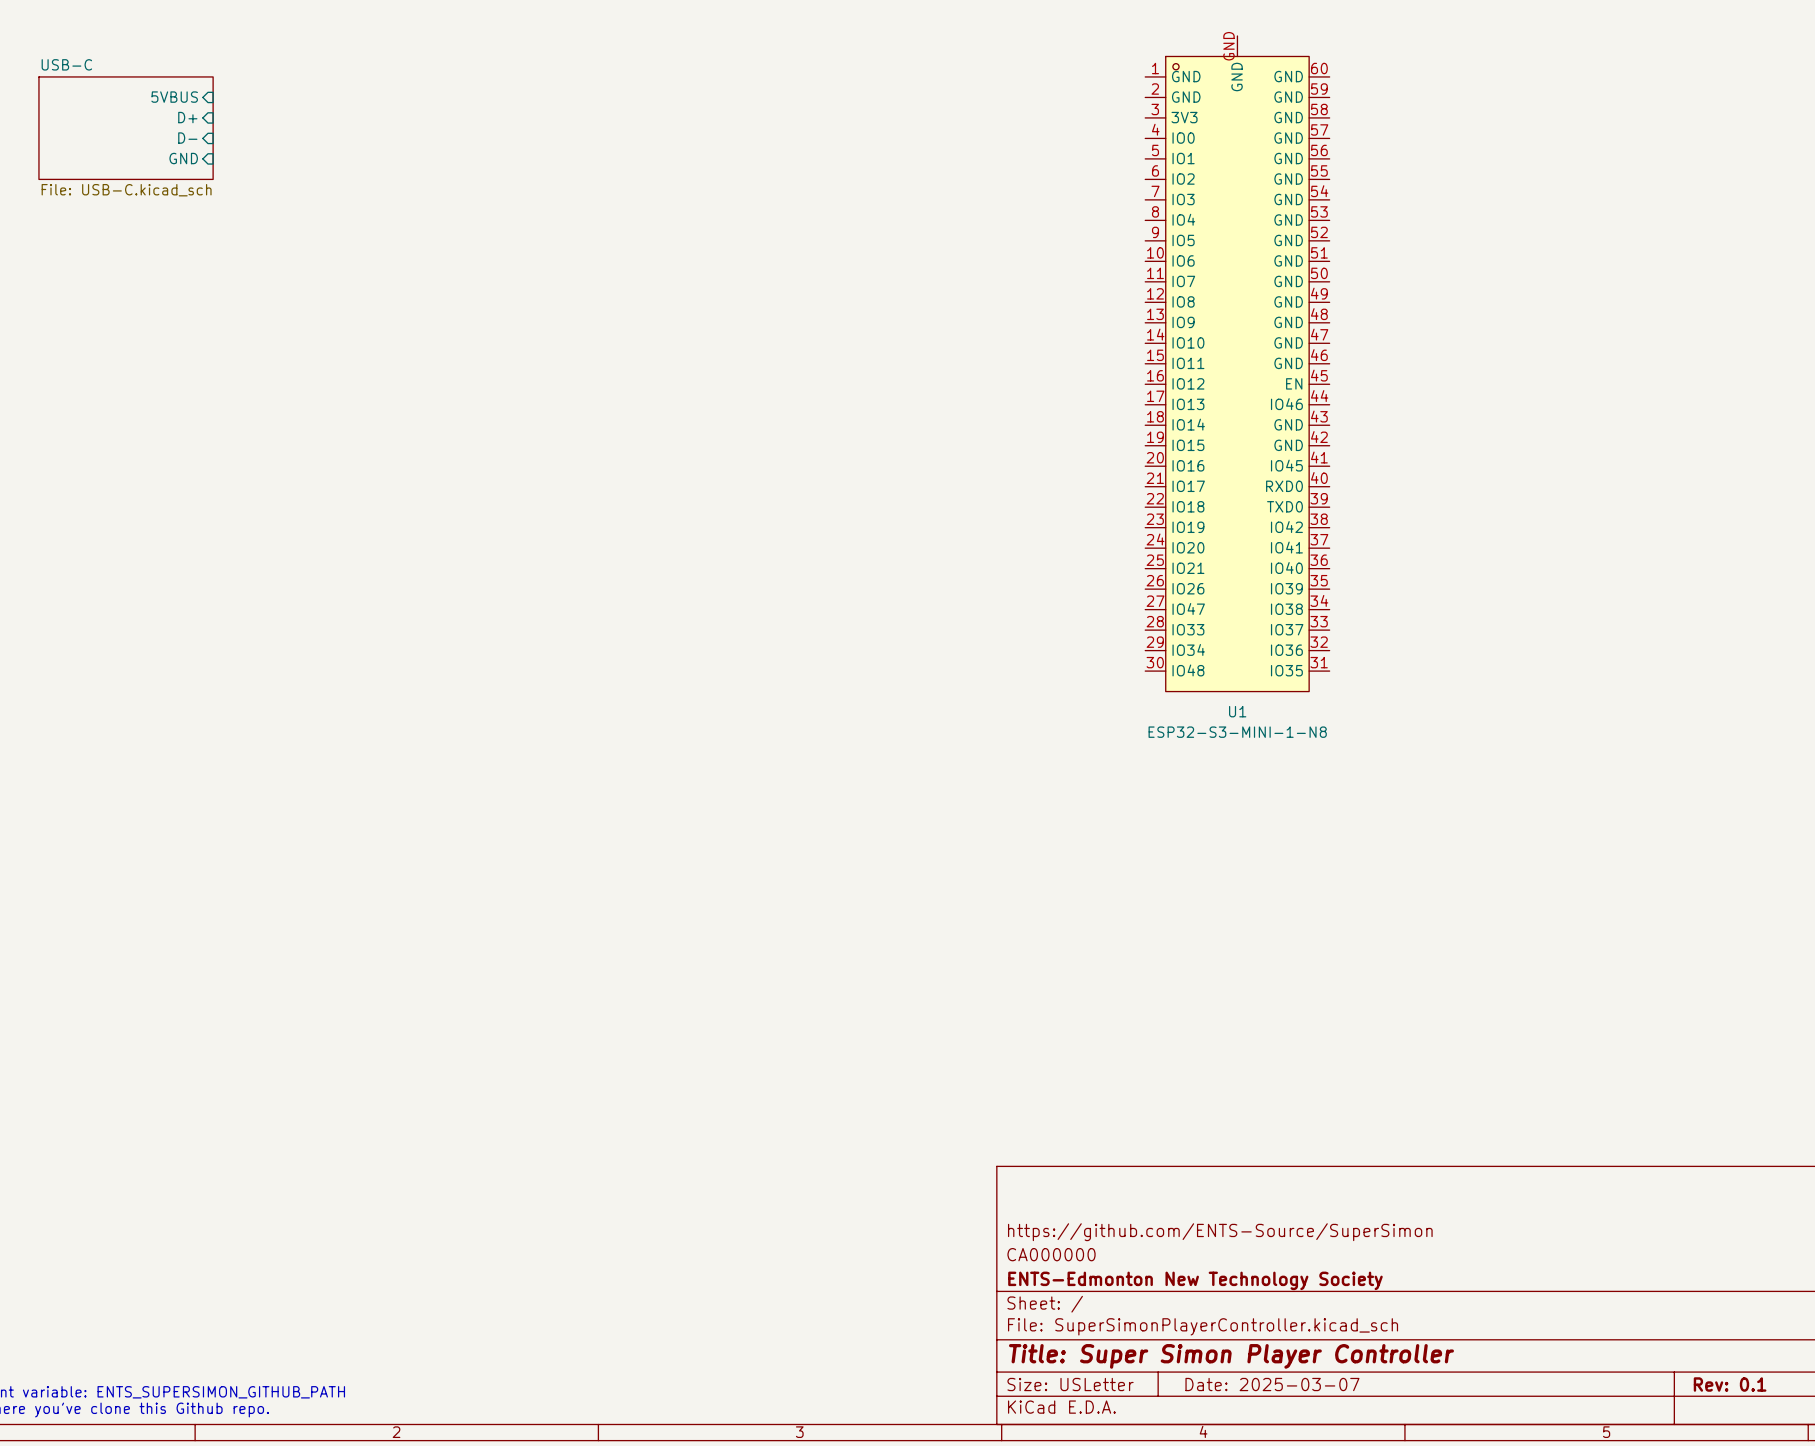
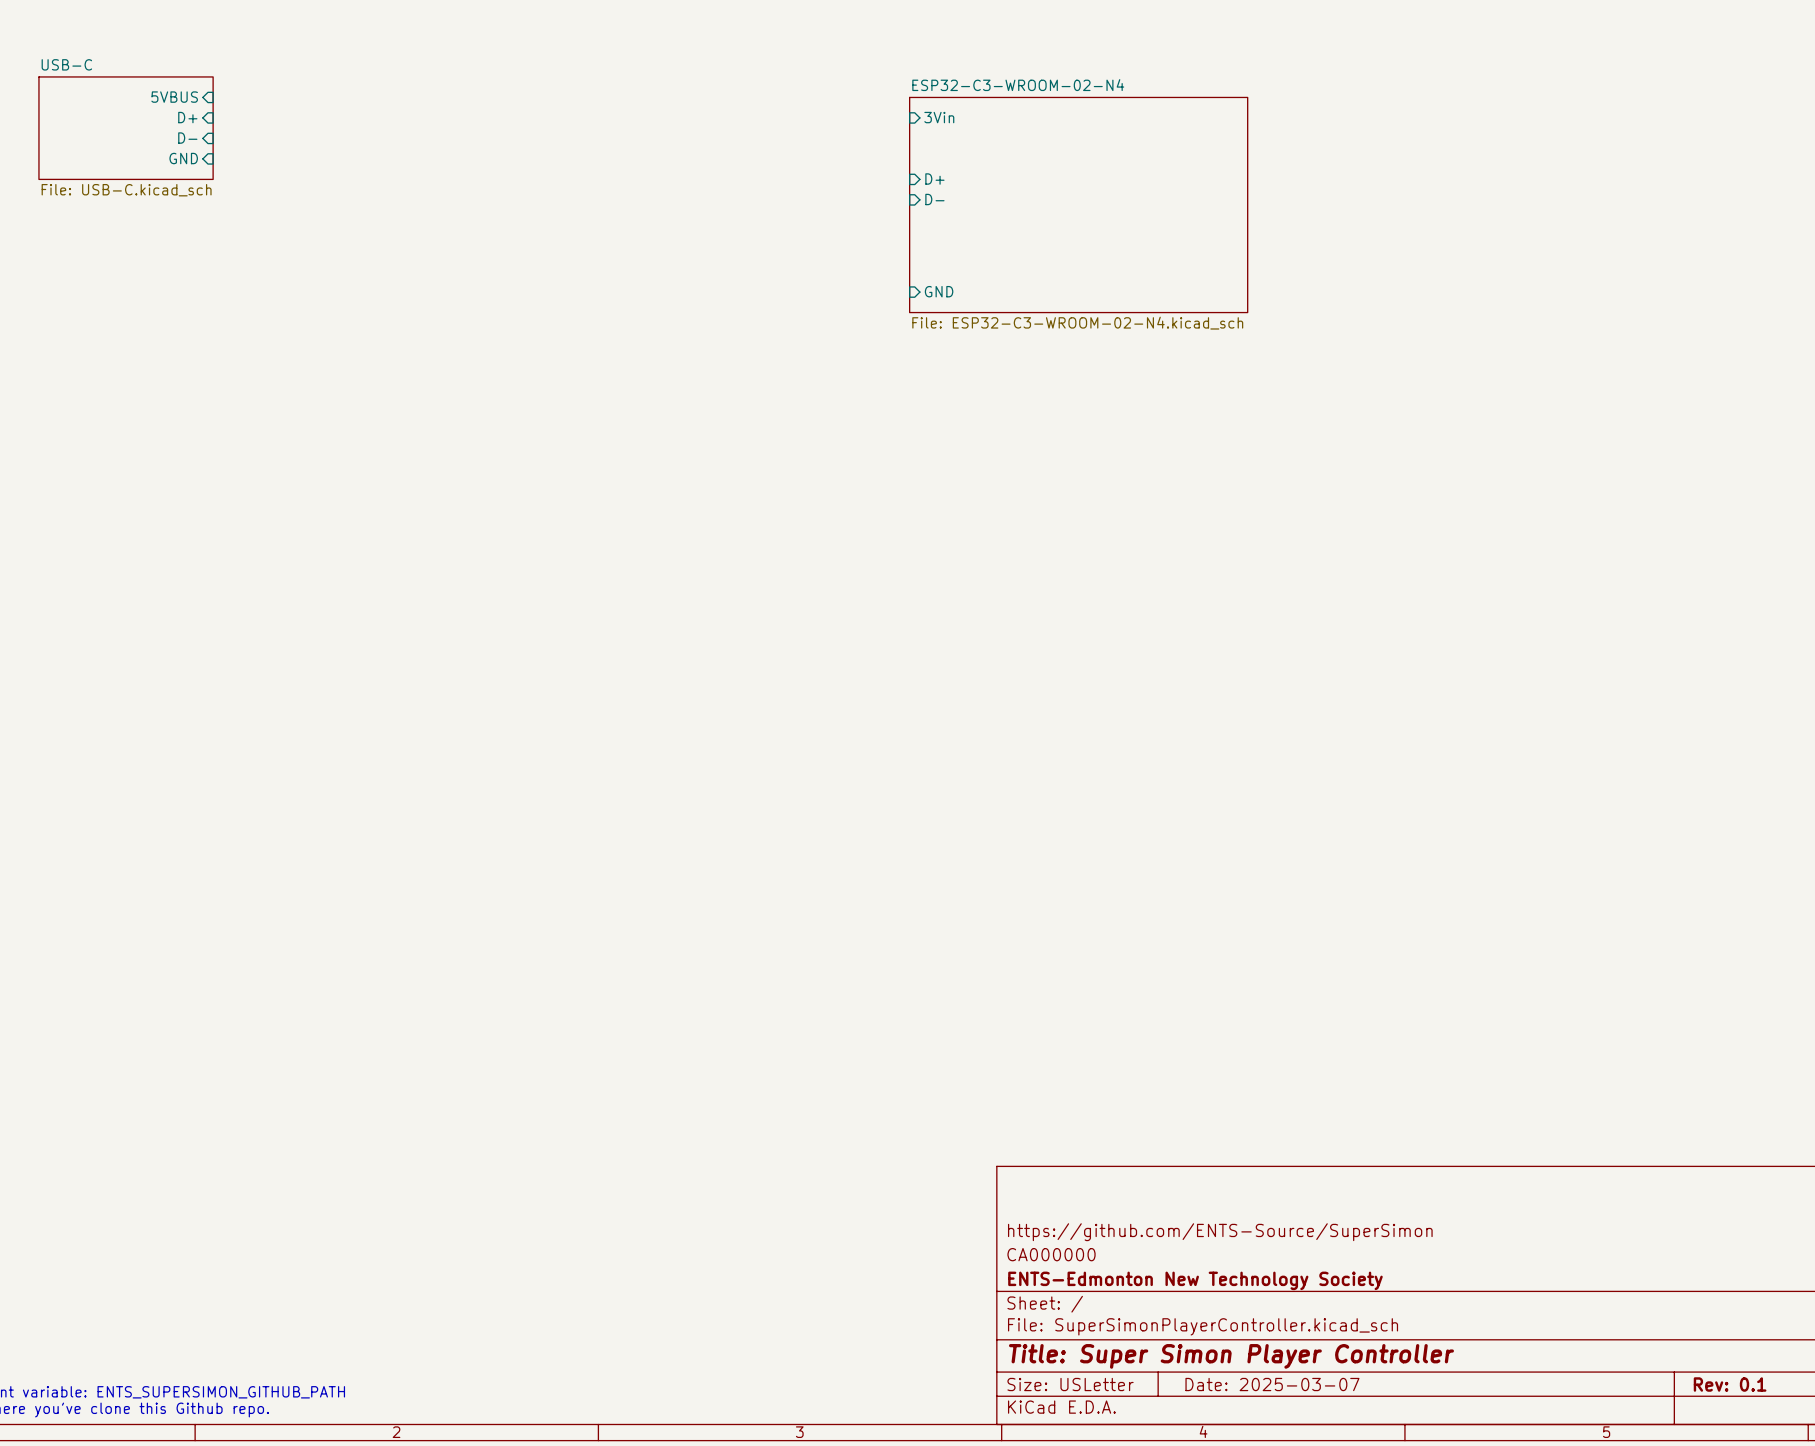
sheet pin: none -> 3Vin (939, 117)
sheet pin: none -> D+ (934, 179)
sheet pin: none -> D- (934, 199)
sheet ESP32-C3-WROOM-02-N4: none -> File: ESP32-C3-WROOM-02-N4.kicad_sch (1078, 205)
sheet pin: none -> GND (939, 291)
U1: ESP32-S3-MINI-1-N8 (1237, 363) -> none

